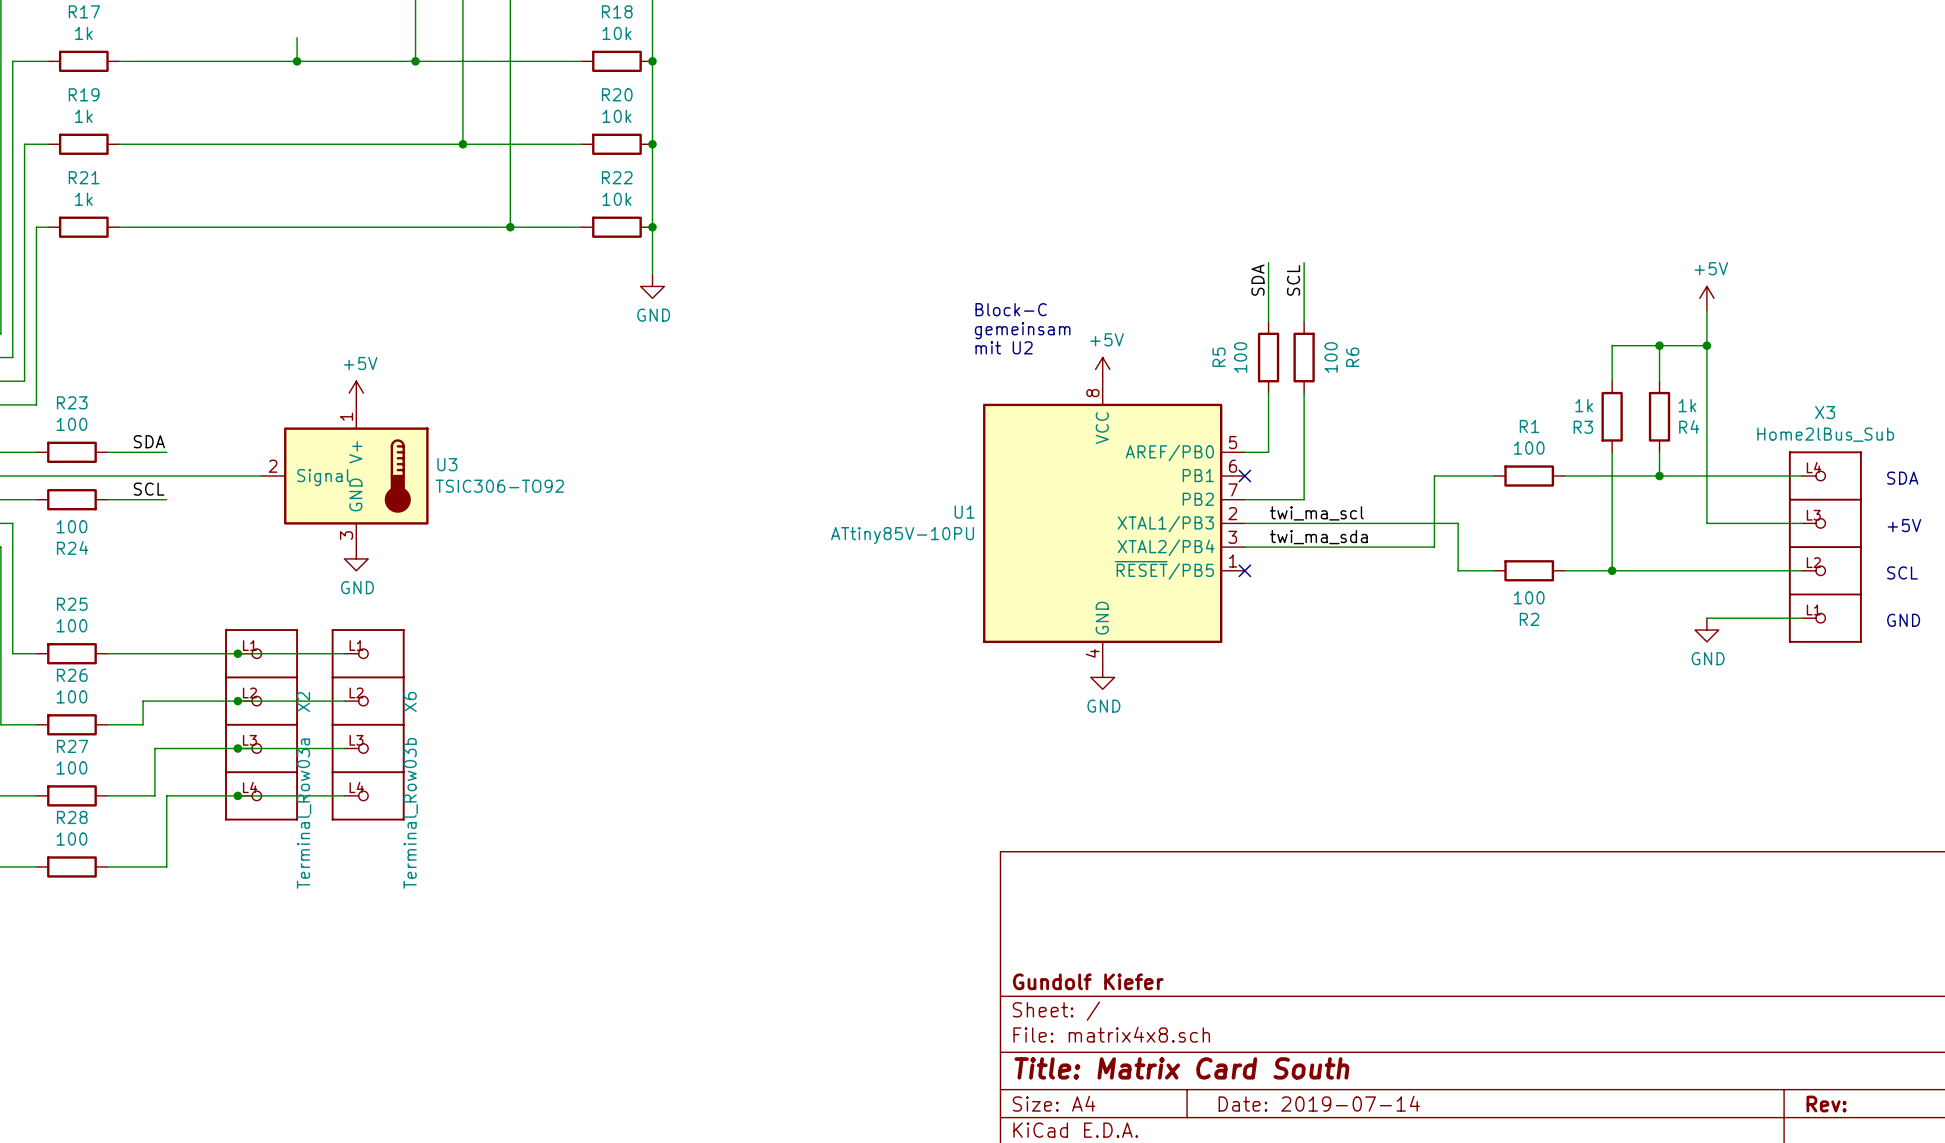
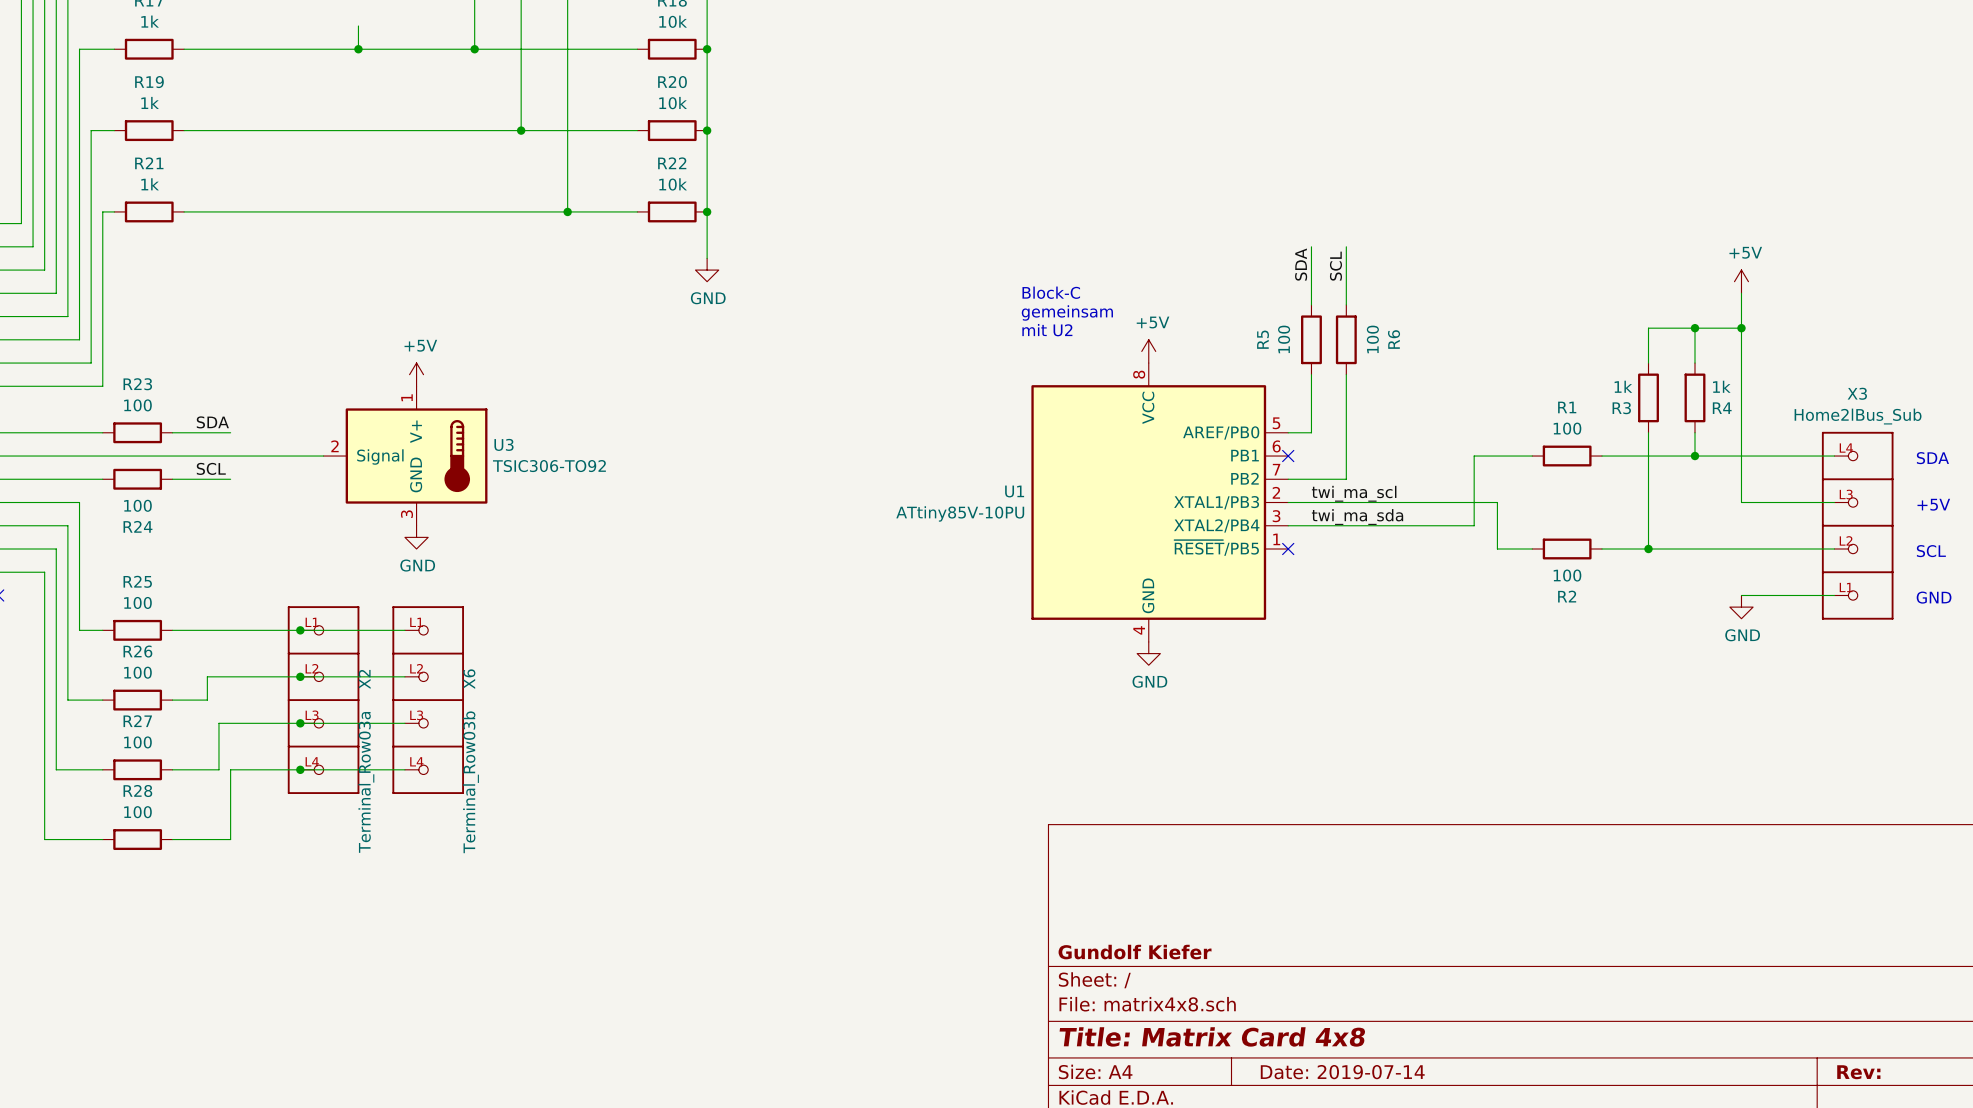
title block: Title: Matrix Card South (1181, 1068) -> Title: Matrix Card 4x8 (1212, 1036)

